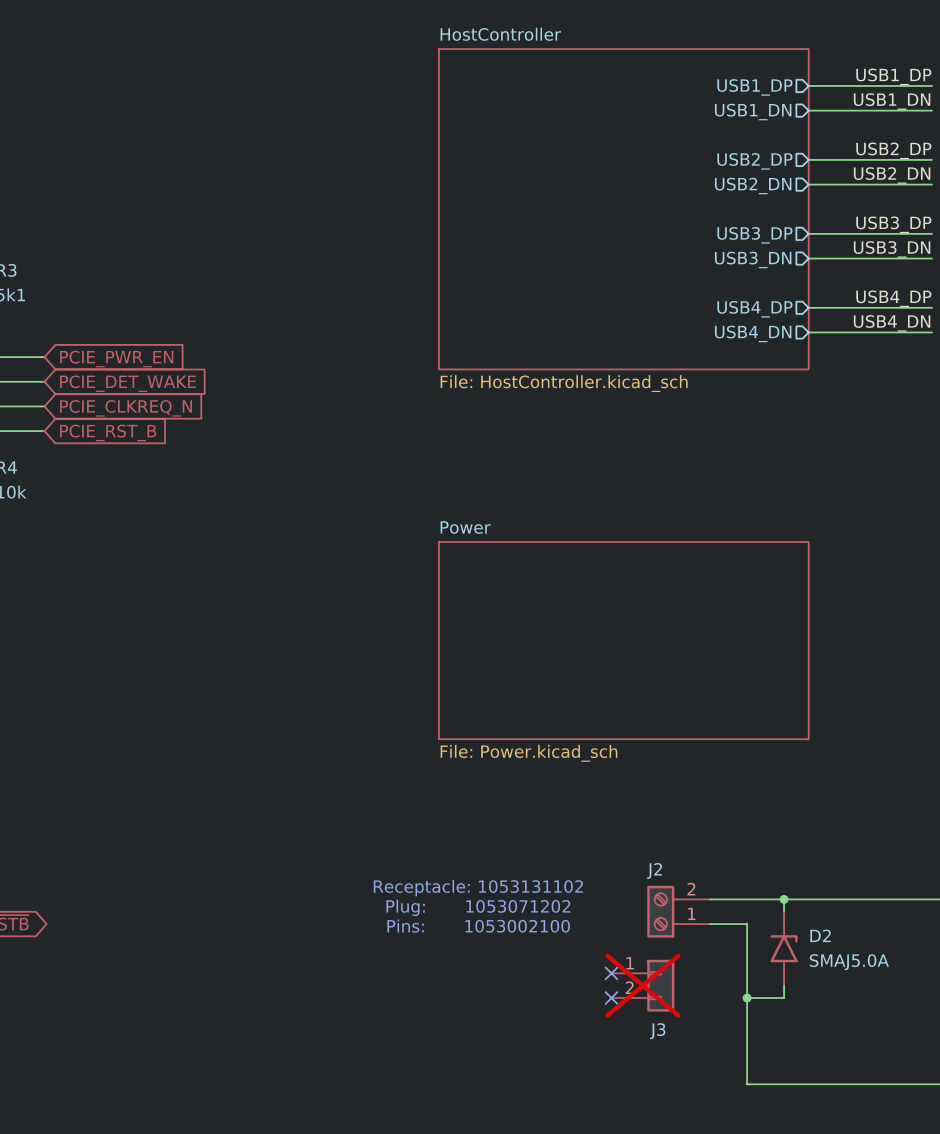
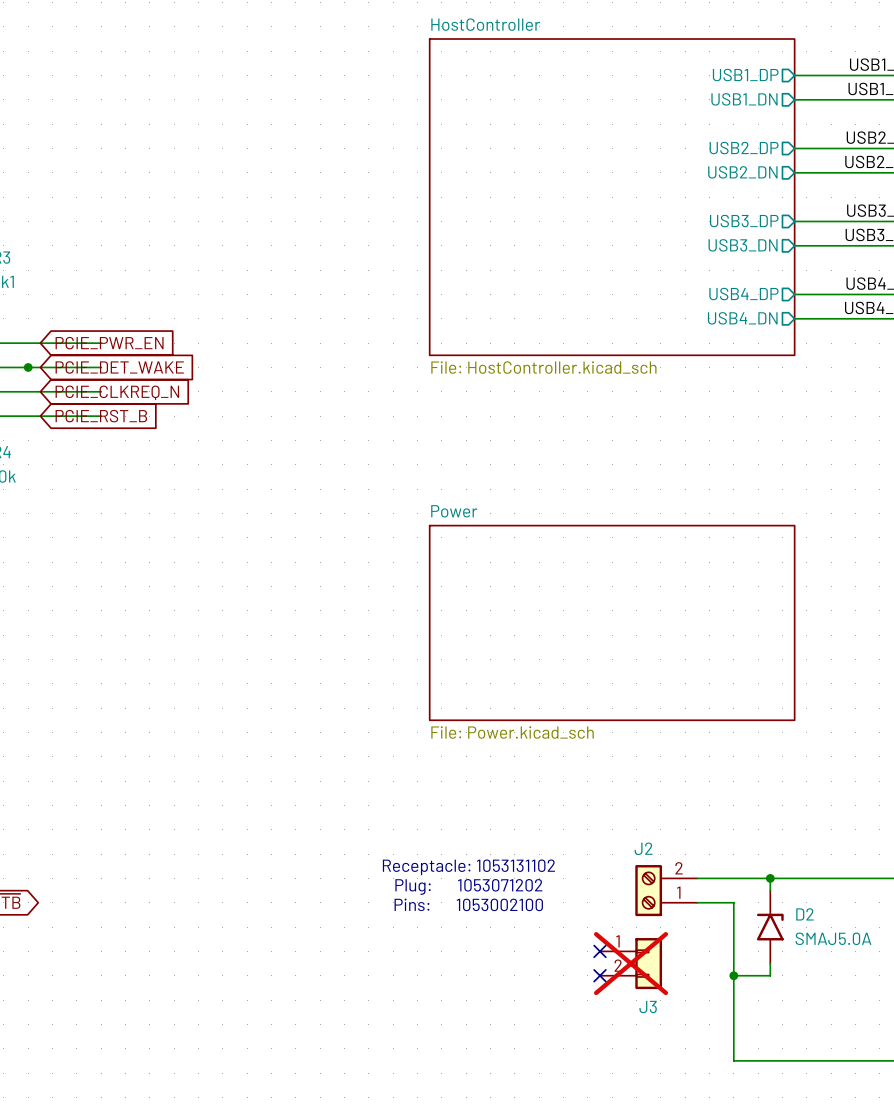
wire: none -> (40, 343) (101, 343)
junction: none -> (28, 367)
wire: none -> (40, 367) (101, 367)
wire: none -> (40, 391) (101, 391)
wire: none -> (40, 416) (101, 416)

